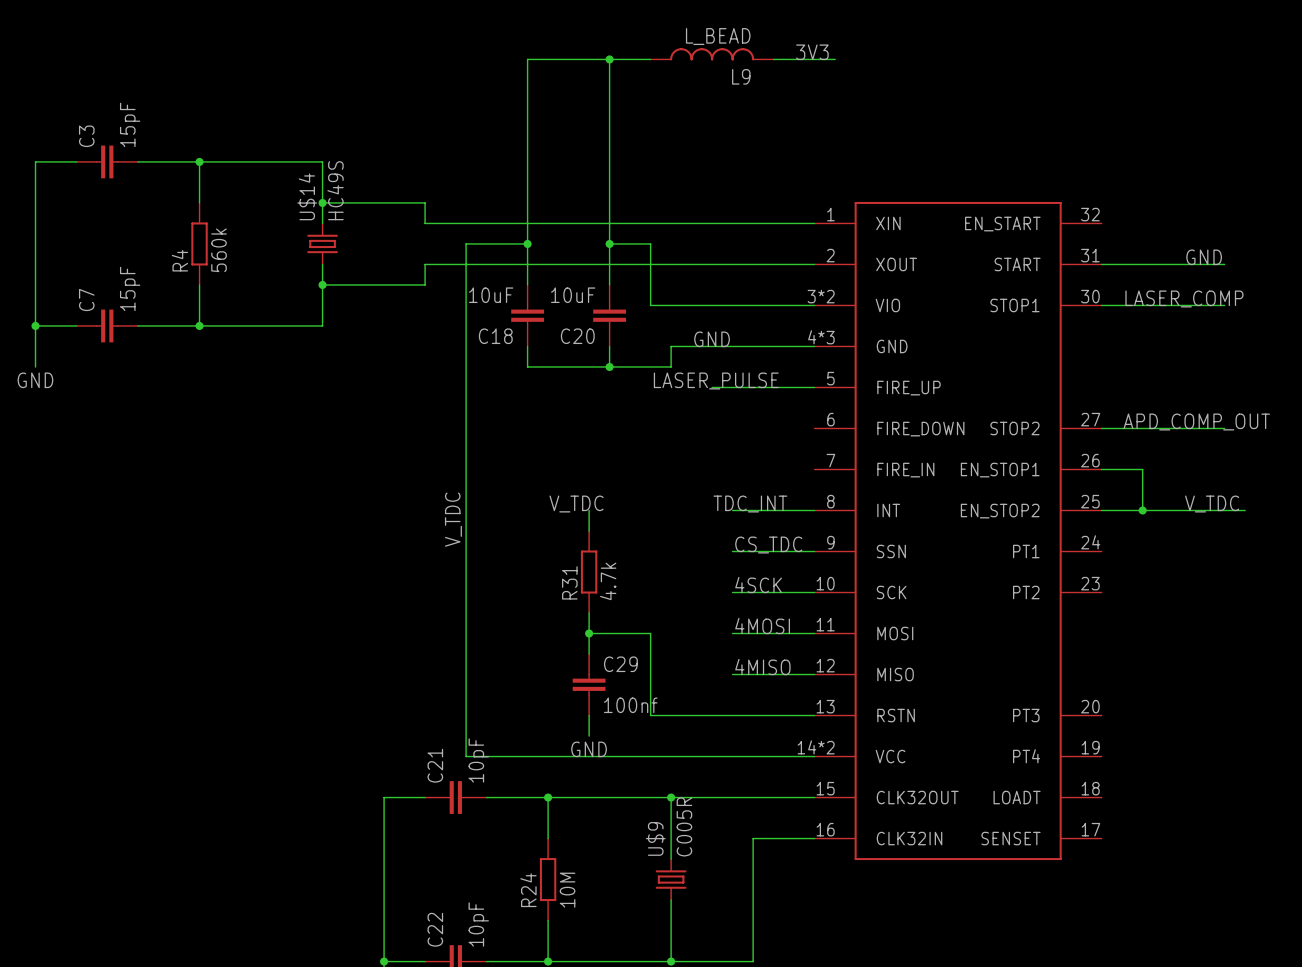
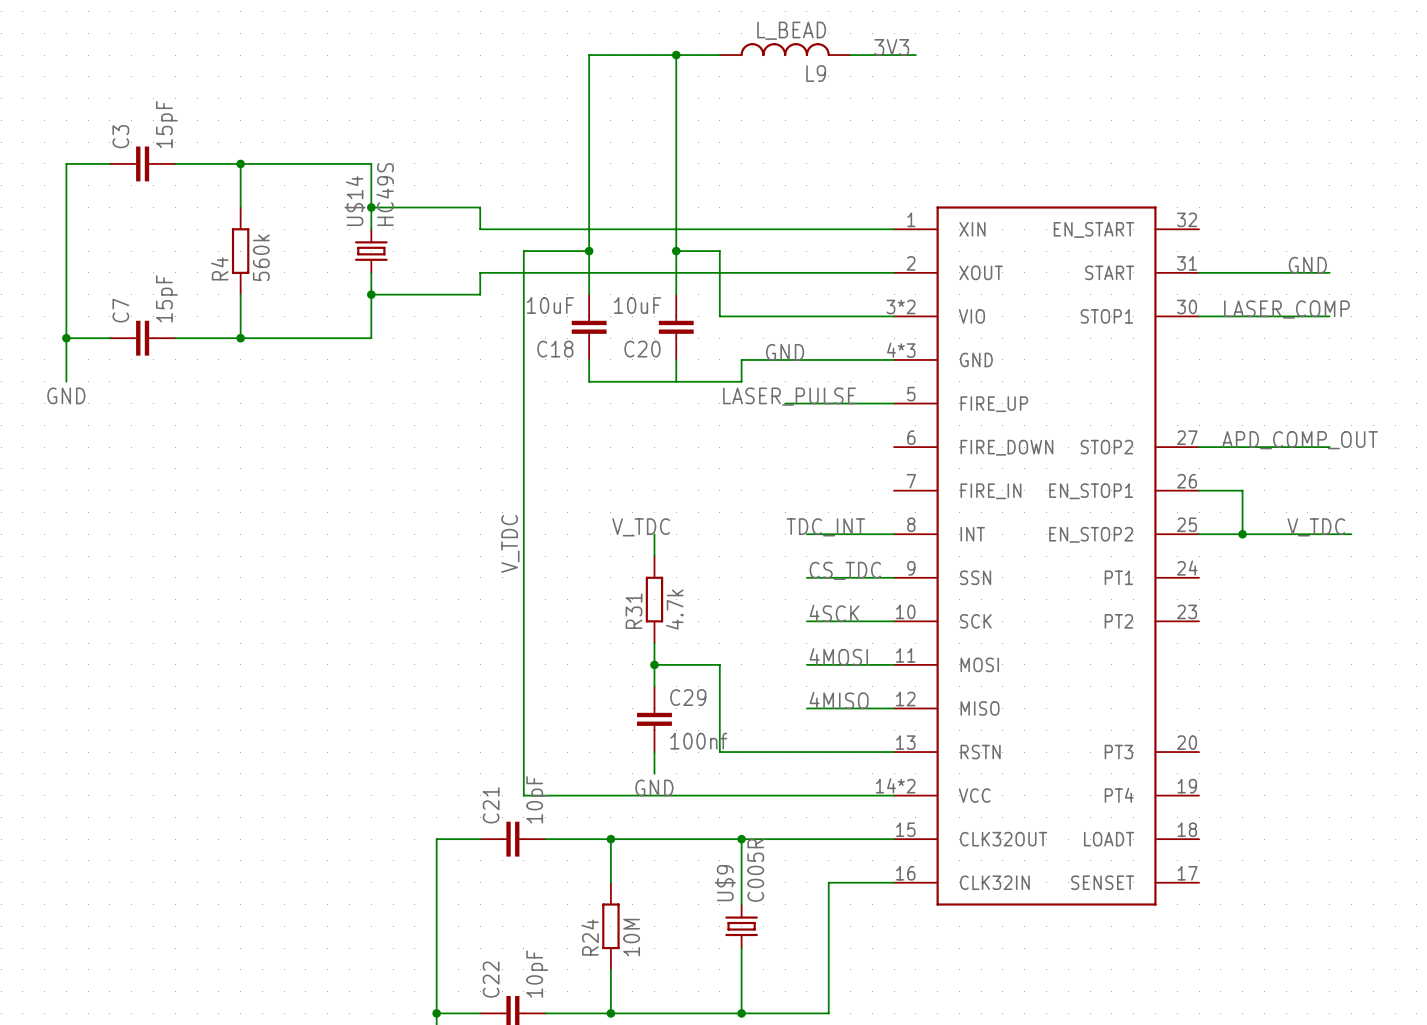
junction: (609, 366) -> none

